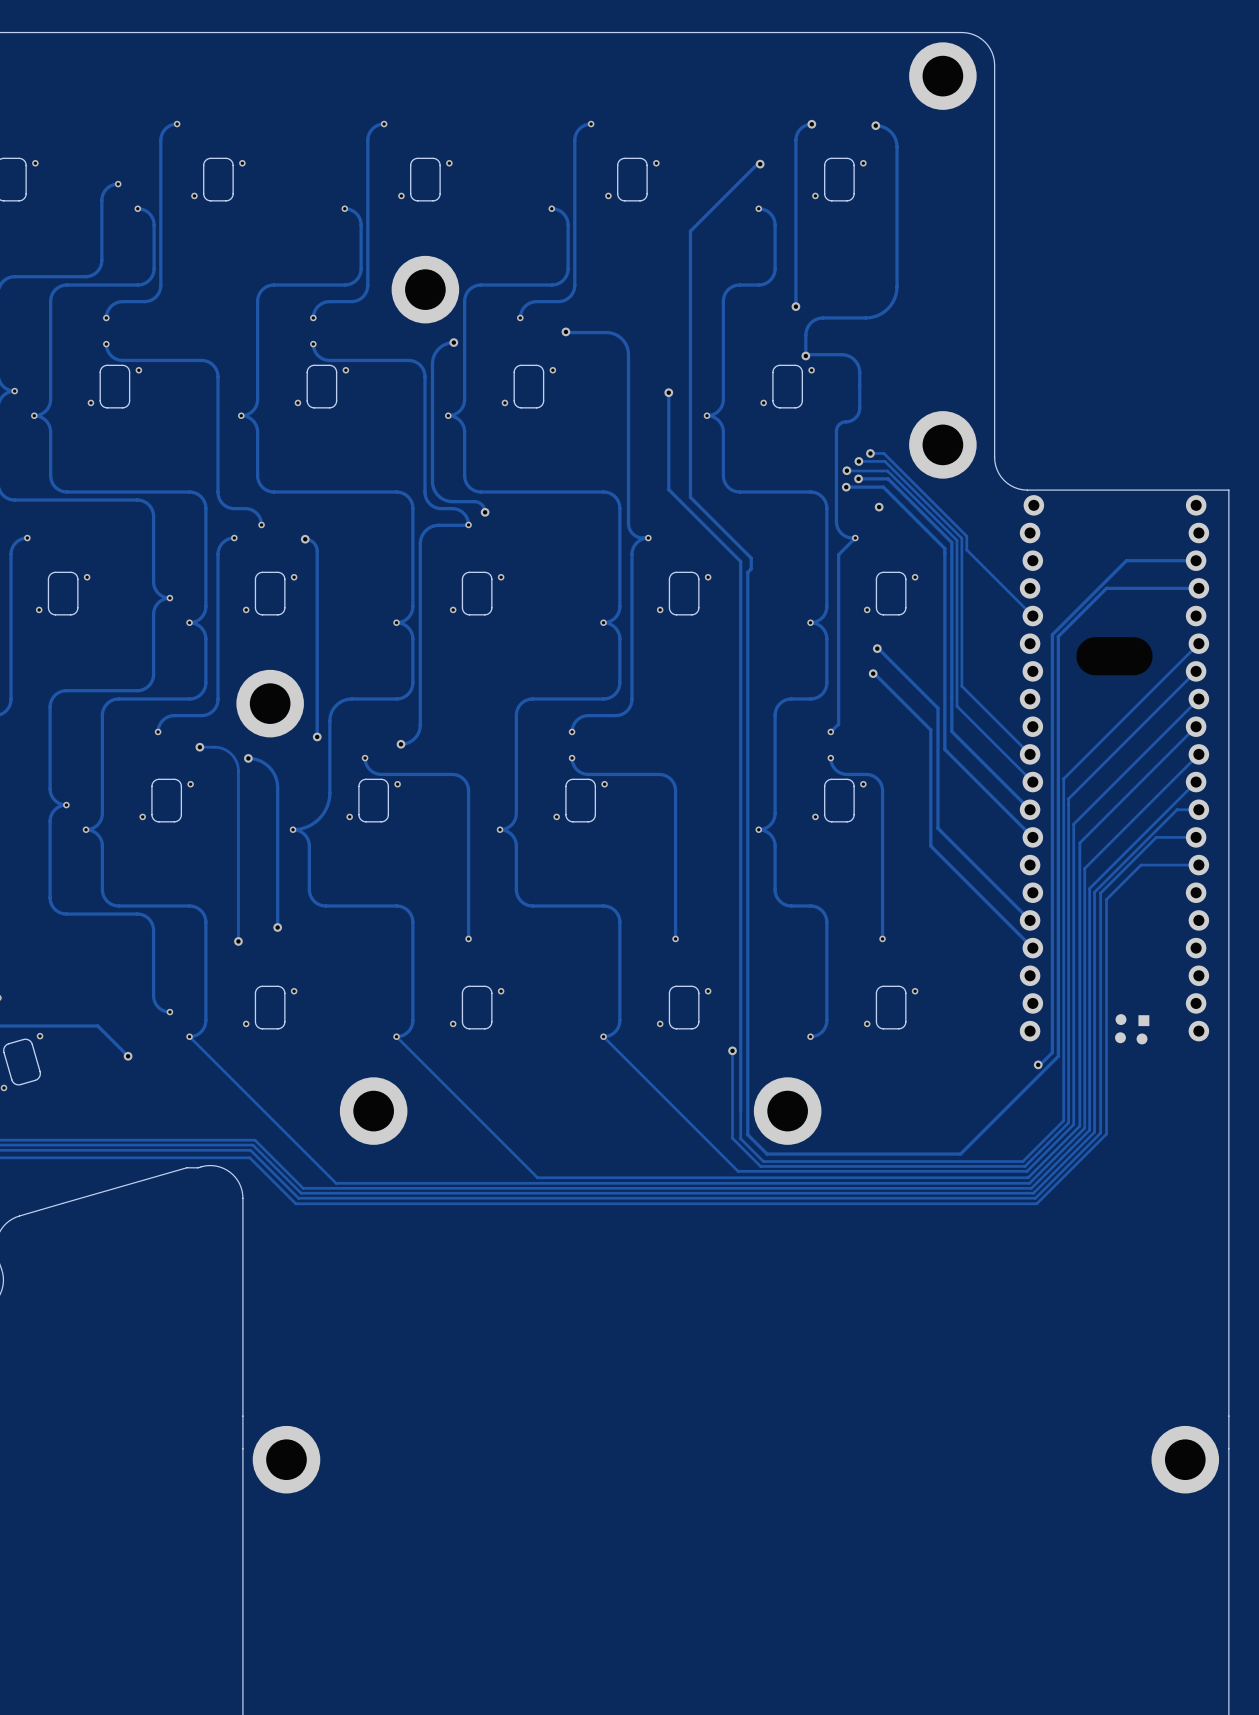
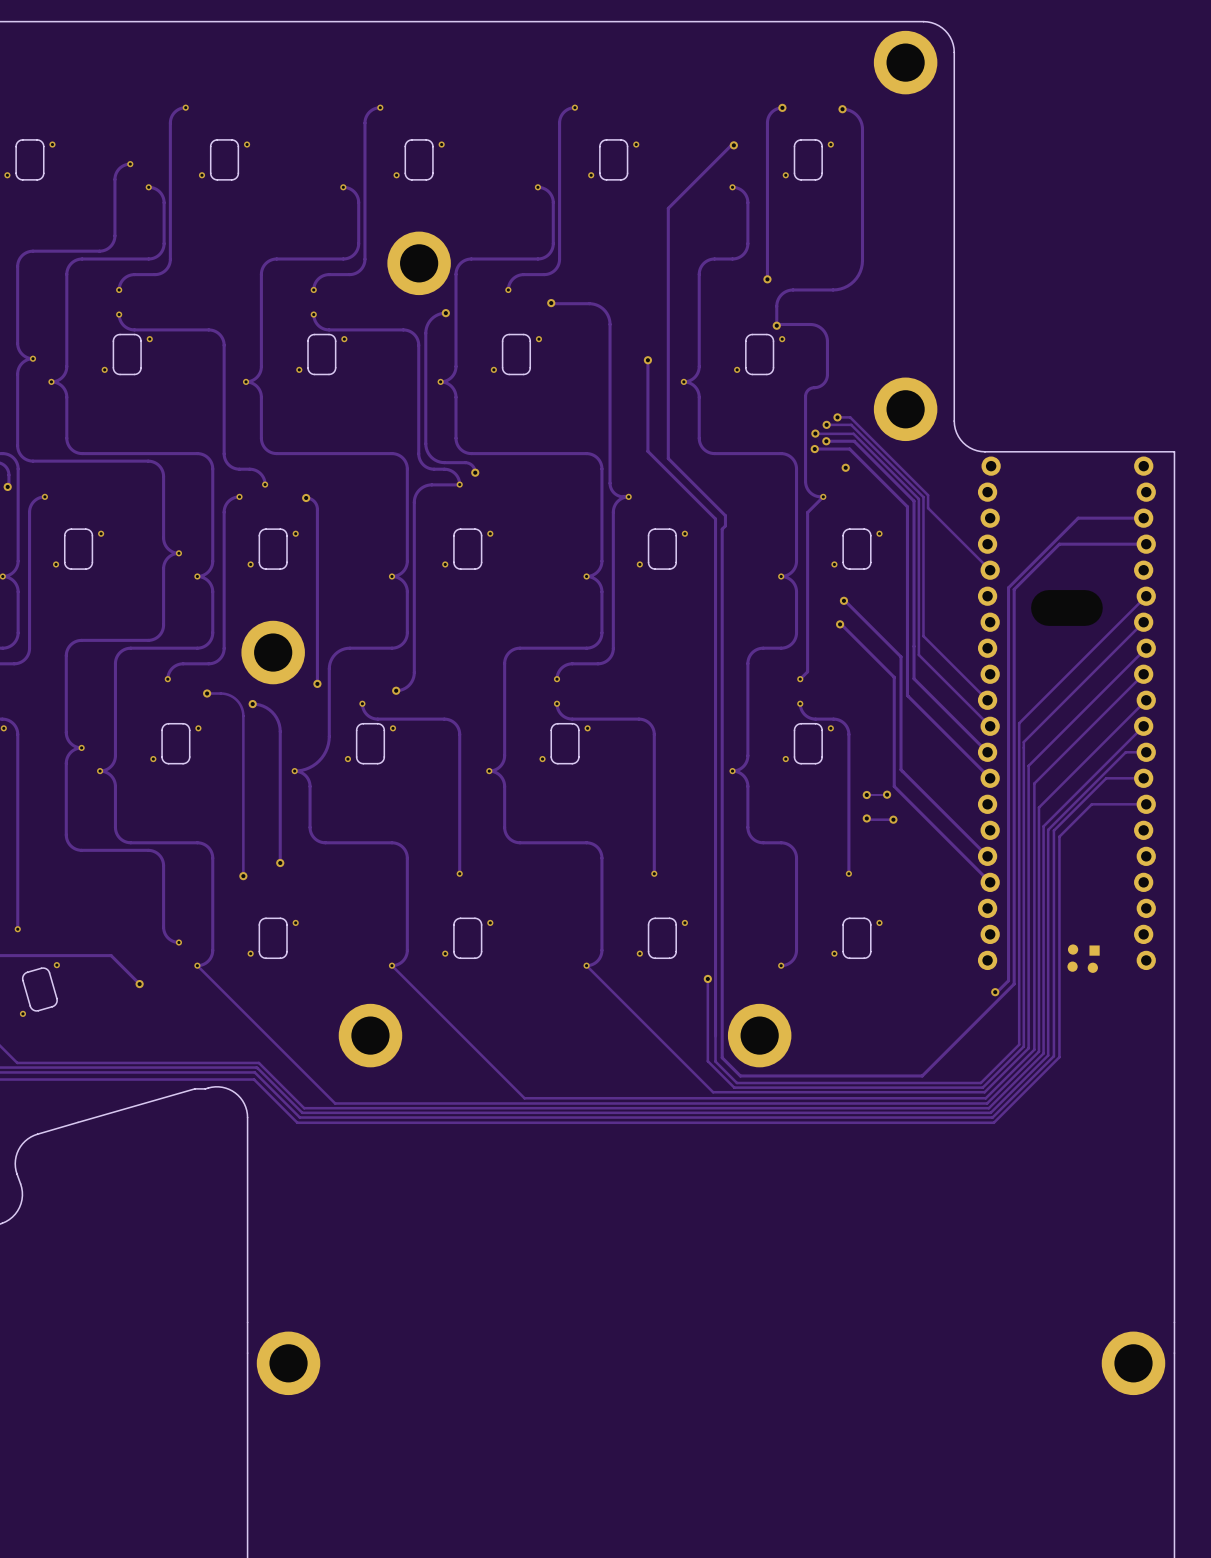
track: none -> (887, 794) (866, 795)
via: none -> (887, 794)
via: none -> (866, 795)
track: none -> (866, 818) (893, 819)
via: none -> (866, 818)
via: none -> (893, 819)

